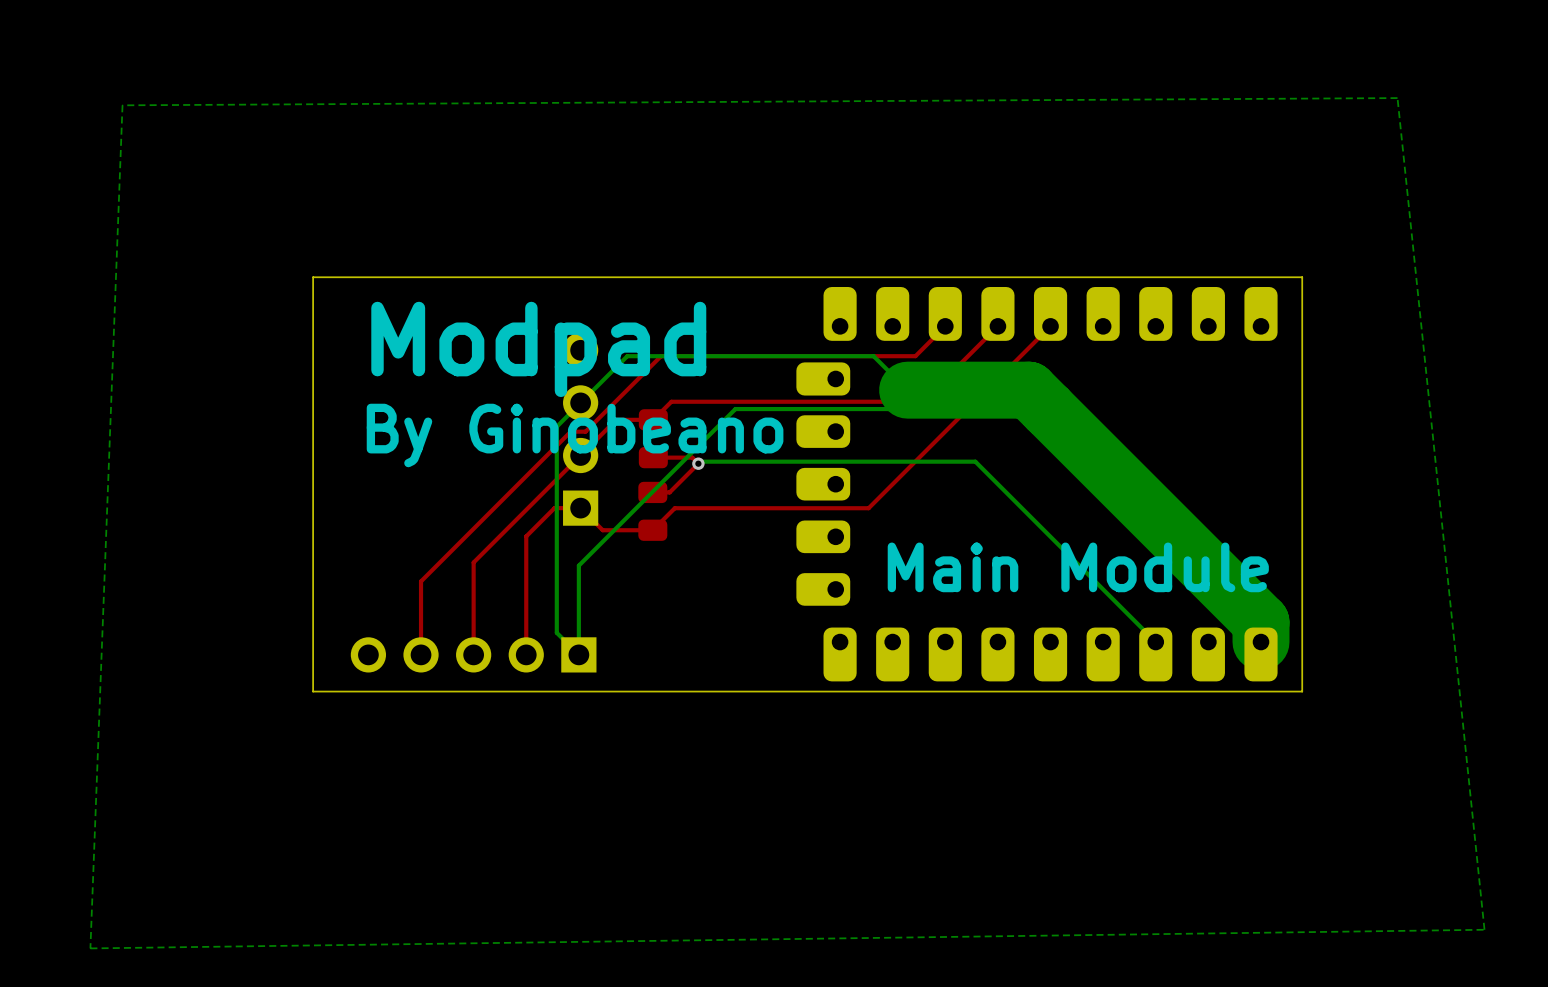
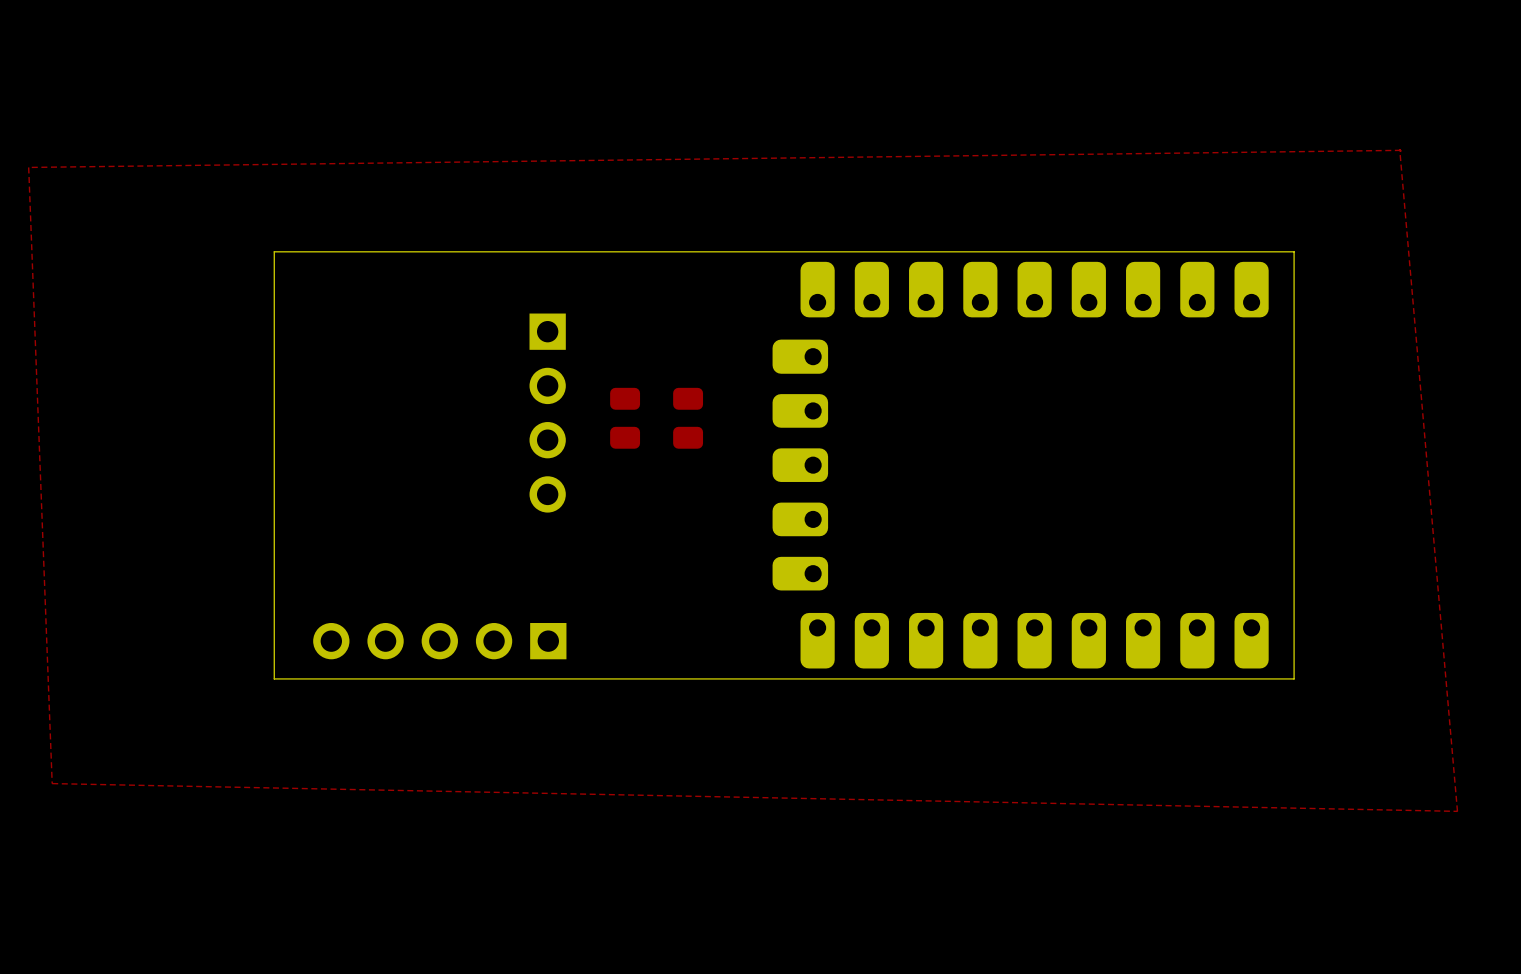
bottom zone outline: (1397, 98) (122, 105) (90, 948) (1484, 929) (1397, 98) -> none
top zone outline: none -> (1399, 149) (1399, 150) (1457, 811) (52, 783) (28, 167) (1400, 150) (1400, 151) (1399, 149)
top track: (945, 326) (915, 356) (661, 356) (585, 431) (570, 431) (421, 581) (421, 654) -> none
top track: (997, 326) (922, 401) (671, 401) (653, 419) (616, 419) (473, 562) (473, 654) -> none
top track: (1050, 326) (868, 508) (674, 508) (652, 530) (602, 530) (580, 508) (554, 508) (526, 536) (526, 654) -> none
text: Modpad (538, 349) -> none
bottom track: (1047, 409) (735, 409) (578, 565) (578, 654) (556, 632) (556, 426) (627, 356) (873, 356) (907, 390) (1028, 390) (1261, 622) (1261, 642) -> none
part rotation: 0° (580, 429) -> 180° (547, 413)
text: By Ginobeano (575, 435) -> none
top track: (653, 457) (692, 457) (698, 463) (669, 492) (652, 492) -> none
bottom track: (698, 463) (700, 461) (975, 461) (1155, 642) -> none
via: (698, 463) -> none
part position: (652, 511) -> (688, 418)
text: Main Module (1078, 567) -> none

